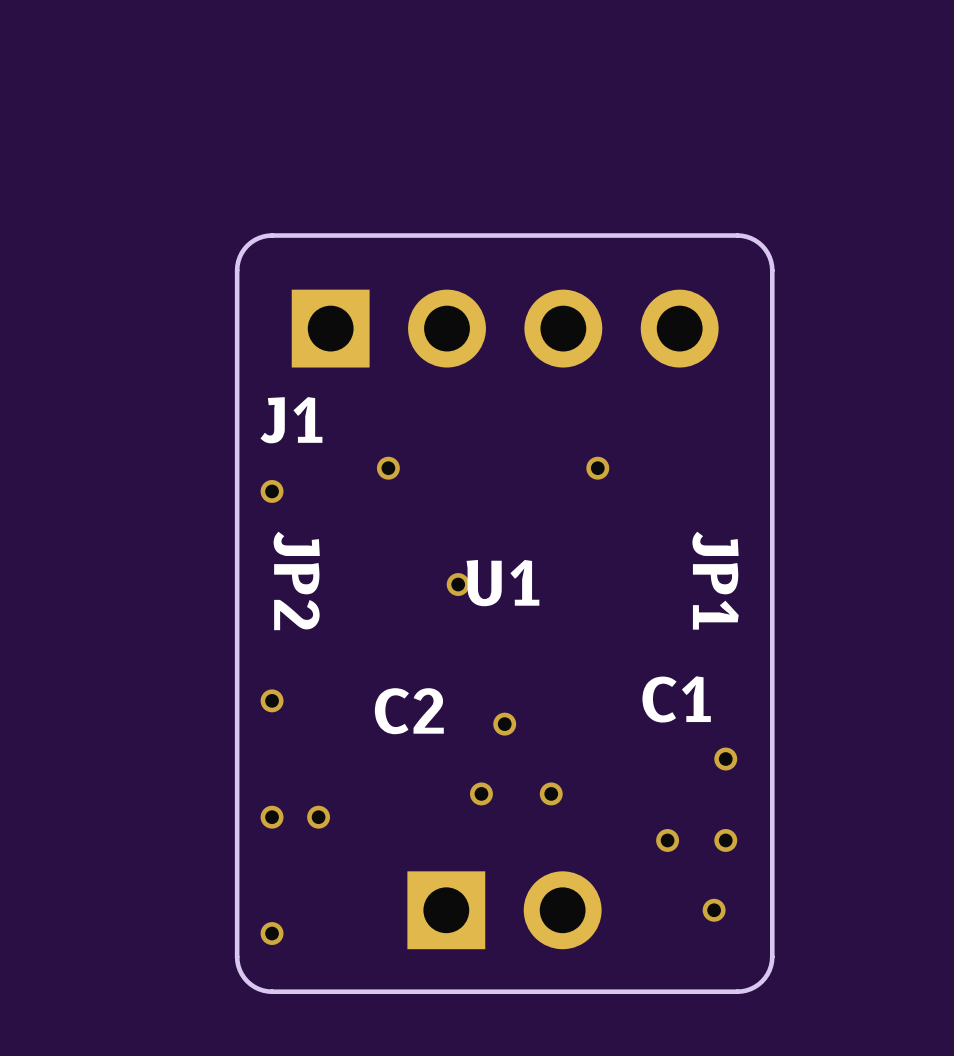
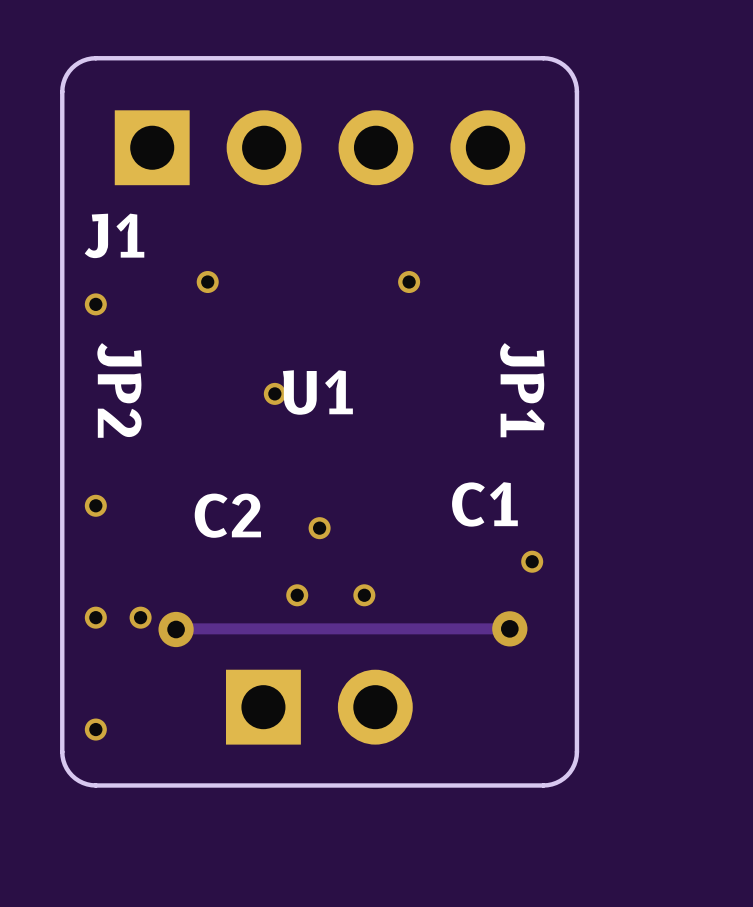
track: none -> (509, 628) (176, 629)
via: none -> (176, 629)
via size: [714, 829, 738, 852] -> [492, 611, 528, 647]
via: (667, 840) -> none
via: (714, 910) -> none

